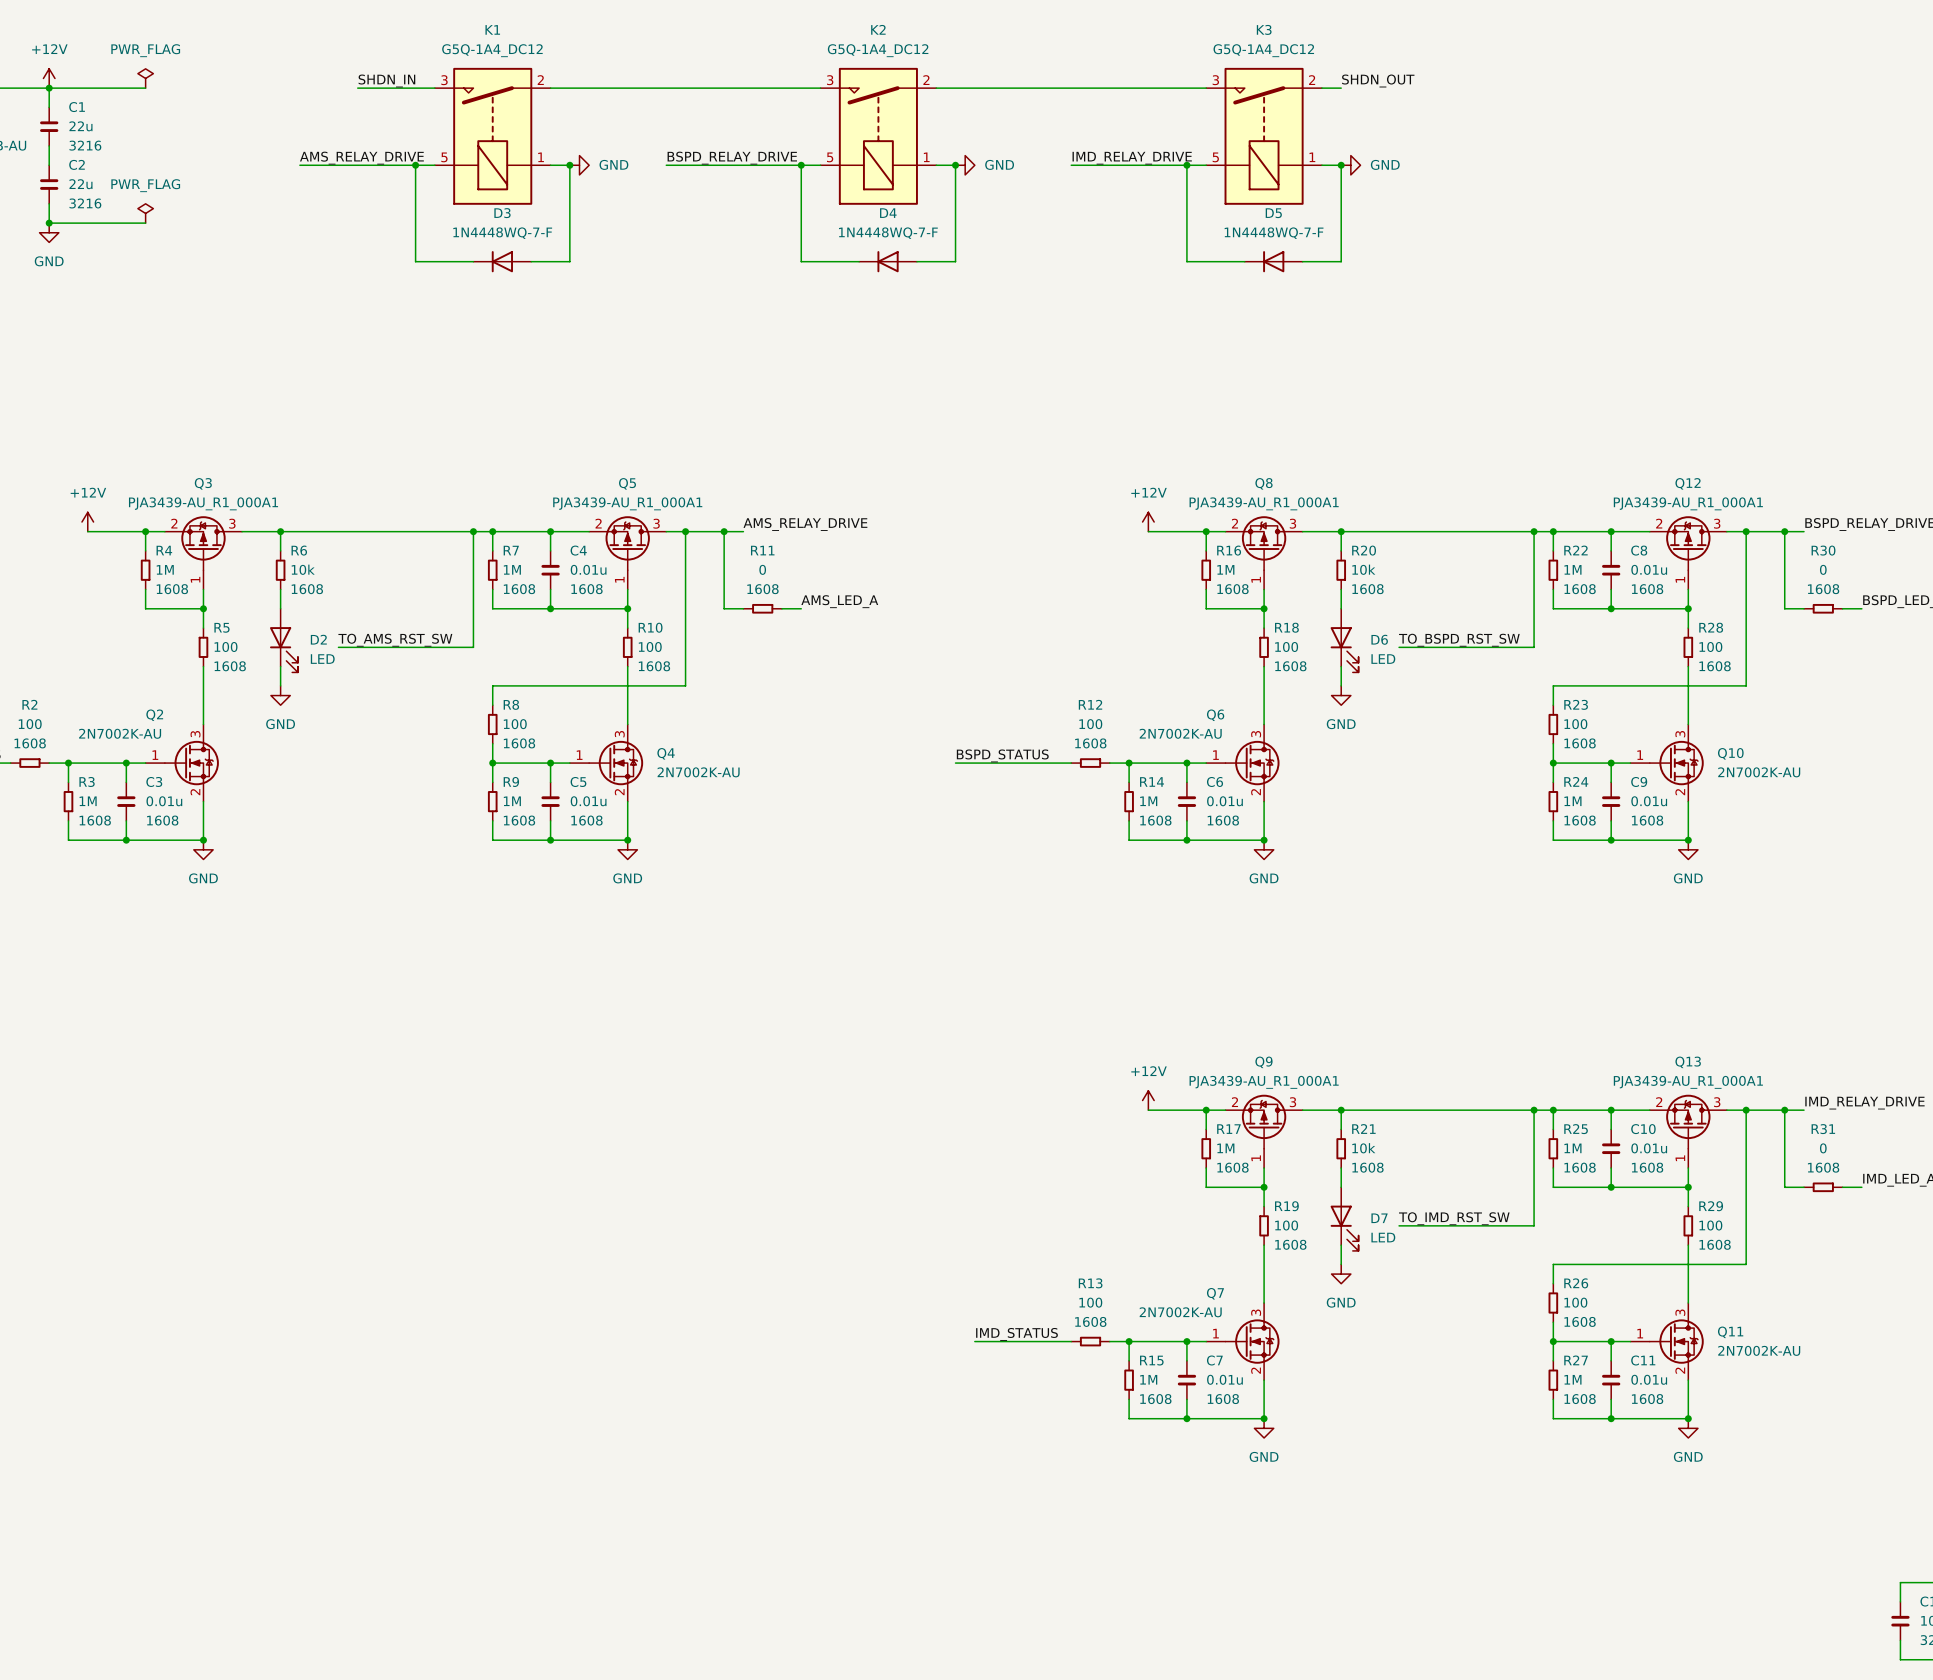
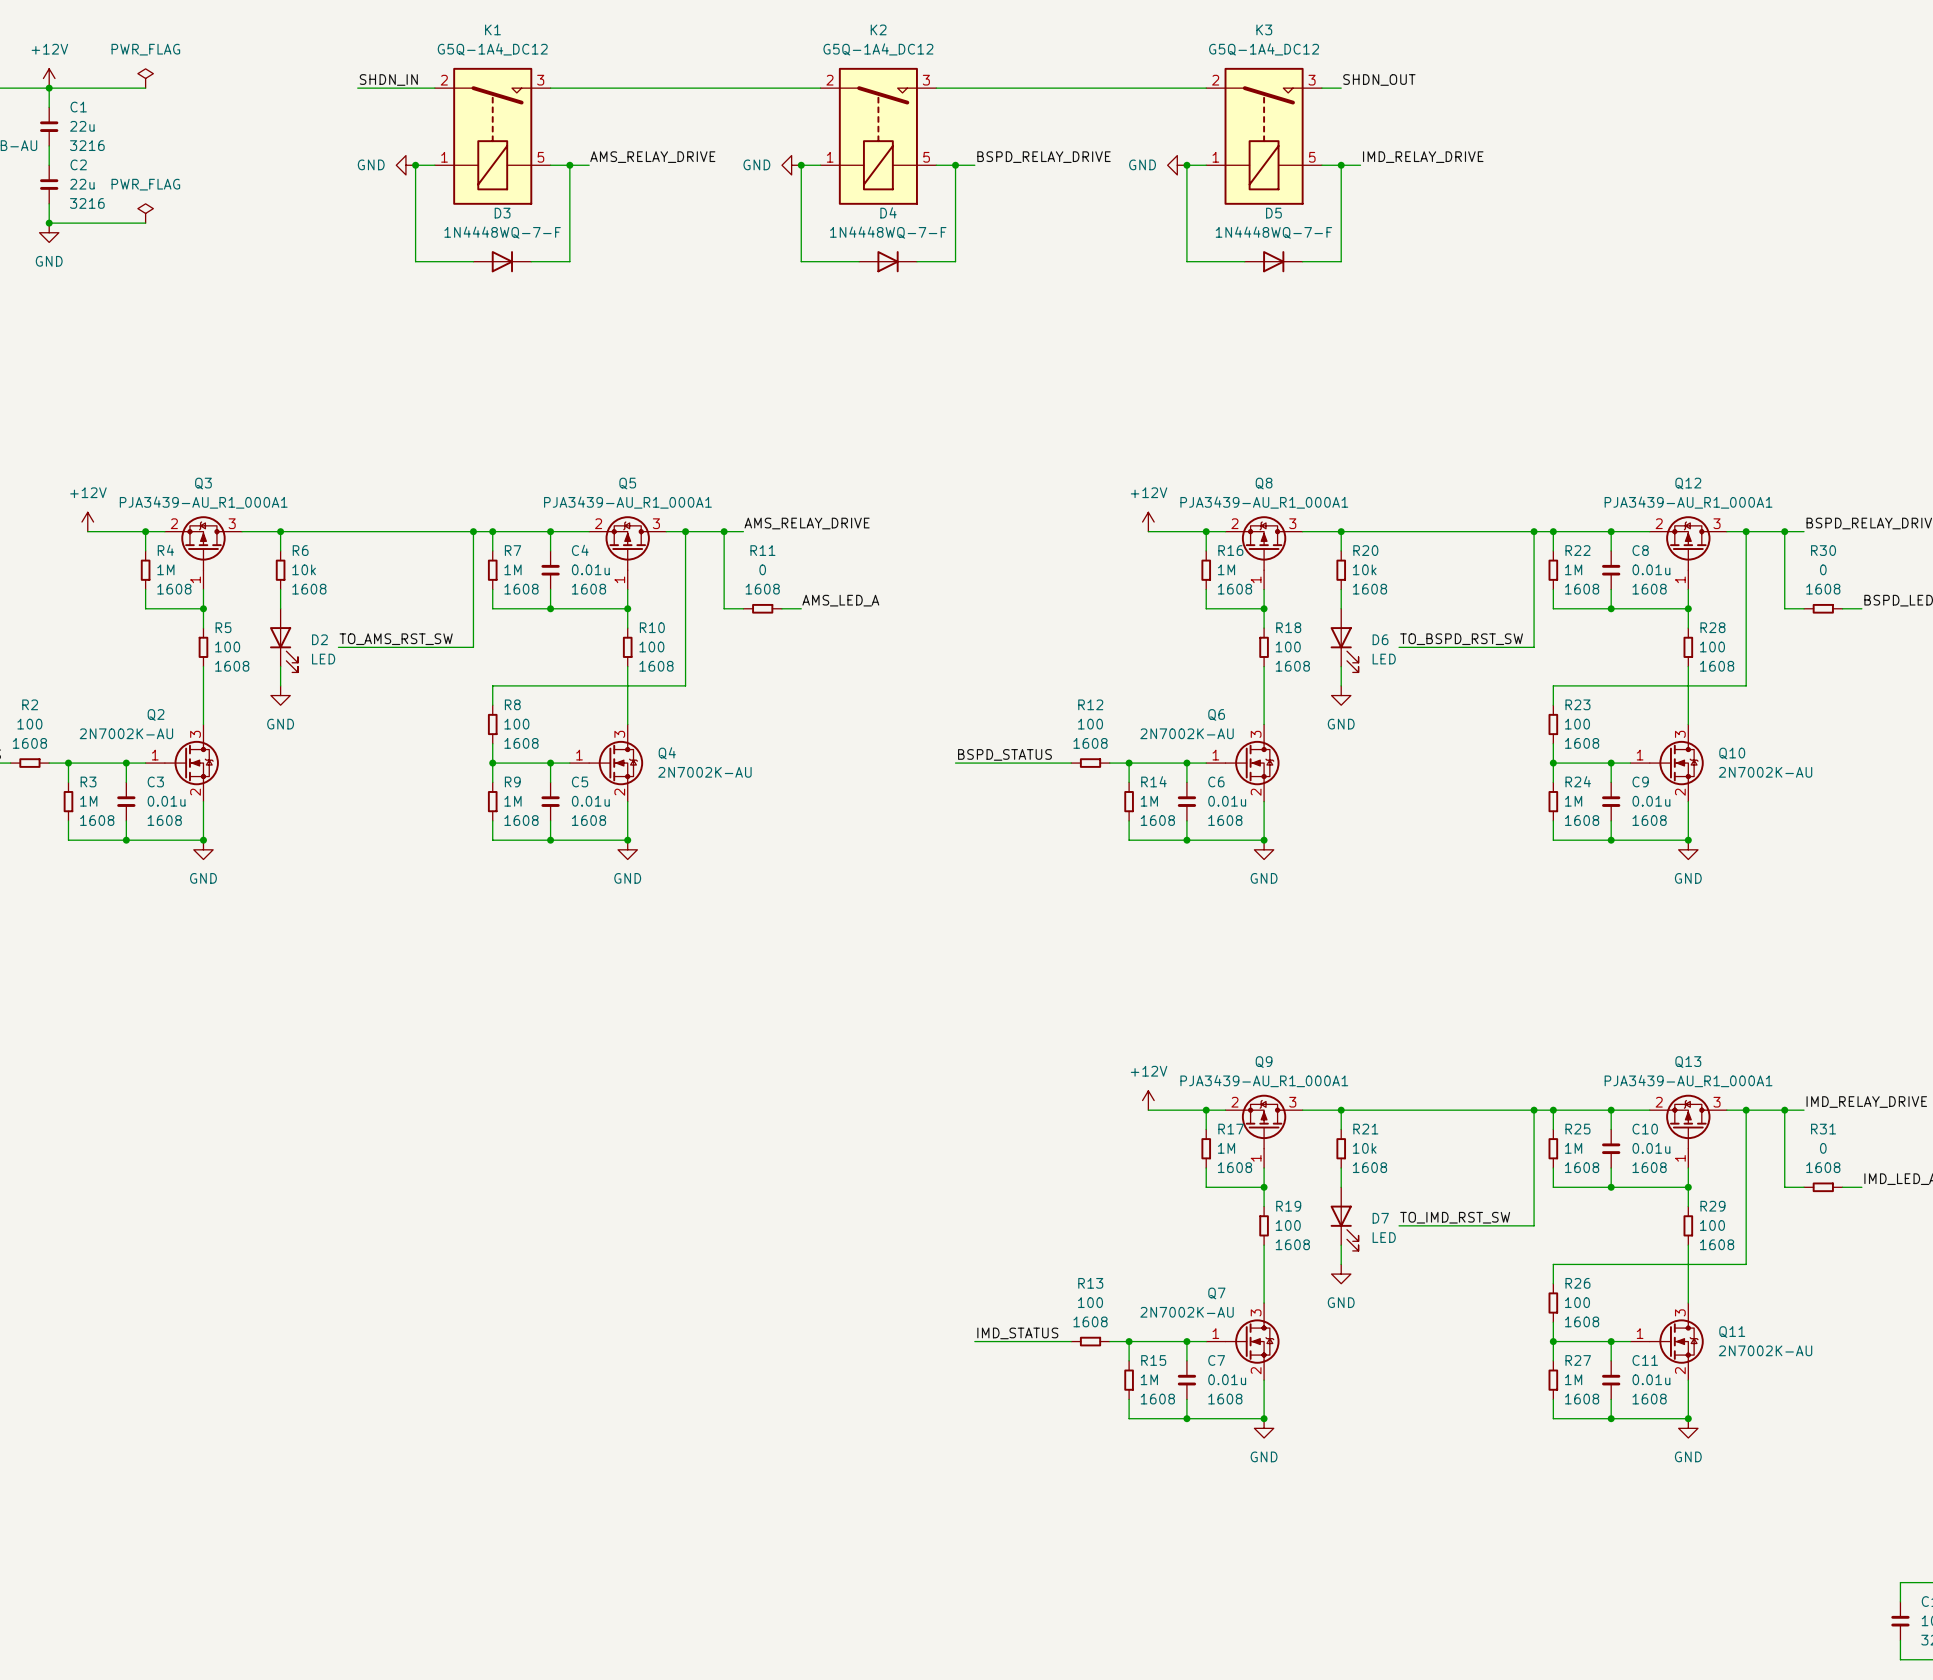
K1 flip: as is (492, 136) -> left-right (492, 136)
K2 flip: as is (878, 136) -> left-right (878, 136)
K3 flip: as is (1264, 136) -> left-right (1264, 136)
label: AMS_RELAY_DRIVE (361, 158) -> none
label: BSPD_RELAY_DRIVE (732, 158) -> AMS_RELAY_DRIVE (652, 157)
label: IMD_RELAY_DRIVE (1132, 158) -> BSPD_RELAY_DRIVE (1043, 157)
label: none -> IMD_RELAY_DRIVE (1423, 157)
wire: (299, 165) (415, 165) -> none
power symbol: none -> GND (405, 165)
power symbol: GND (579, 165) -> none
wire: (666, 165) (801, 165) -> none
power symbol: none -> GND (791, 165)
power symbol: GND (965, 165) -> none
wire: (1071, 165) (1186, 165) -> none
power symbol: none -> GND (1177, 165)
power symbol: GND (1350, 165) -> none
D3 rotation: 0° (502, 261) -> 180° (502, 261)
D4 rotation: 0° (888, 261) -> 180° (888, 261)
D5 rotation: 0° (1273, 261) -> 180° (1273, 261)

